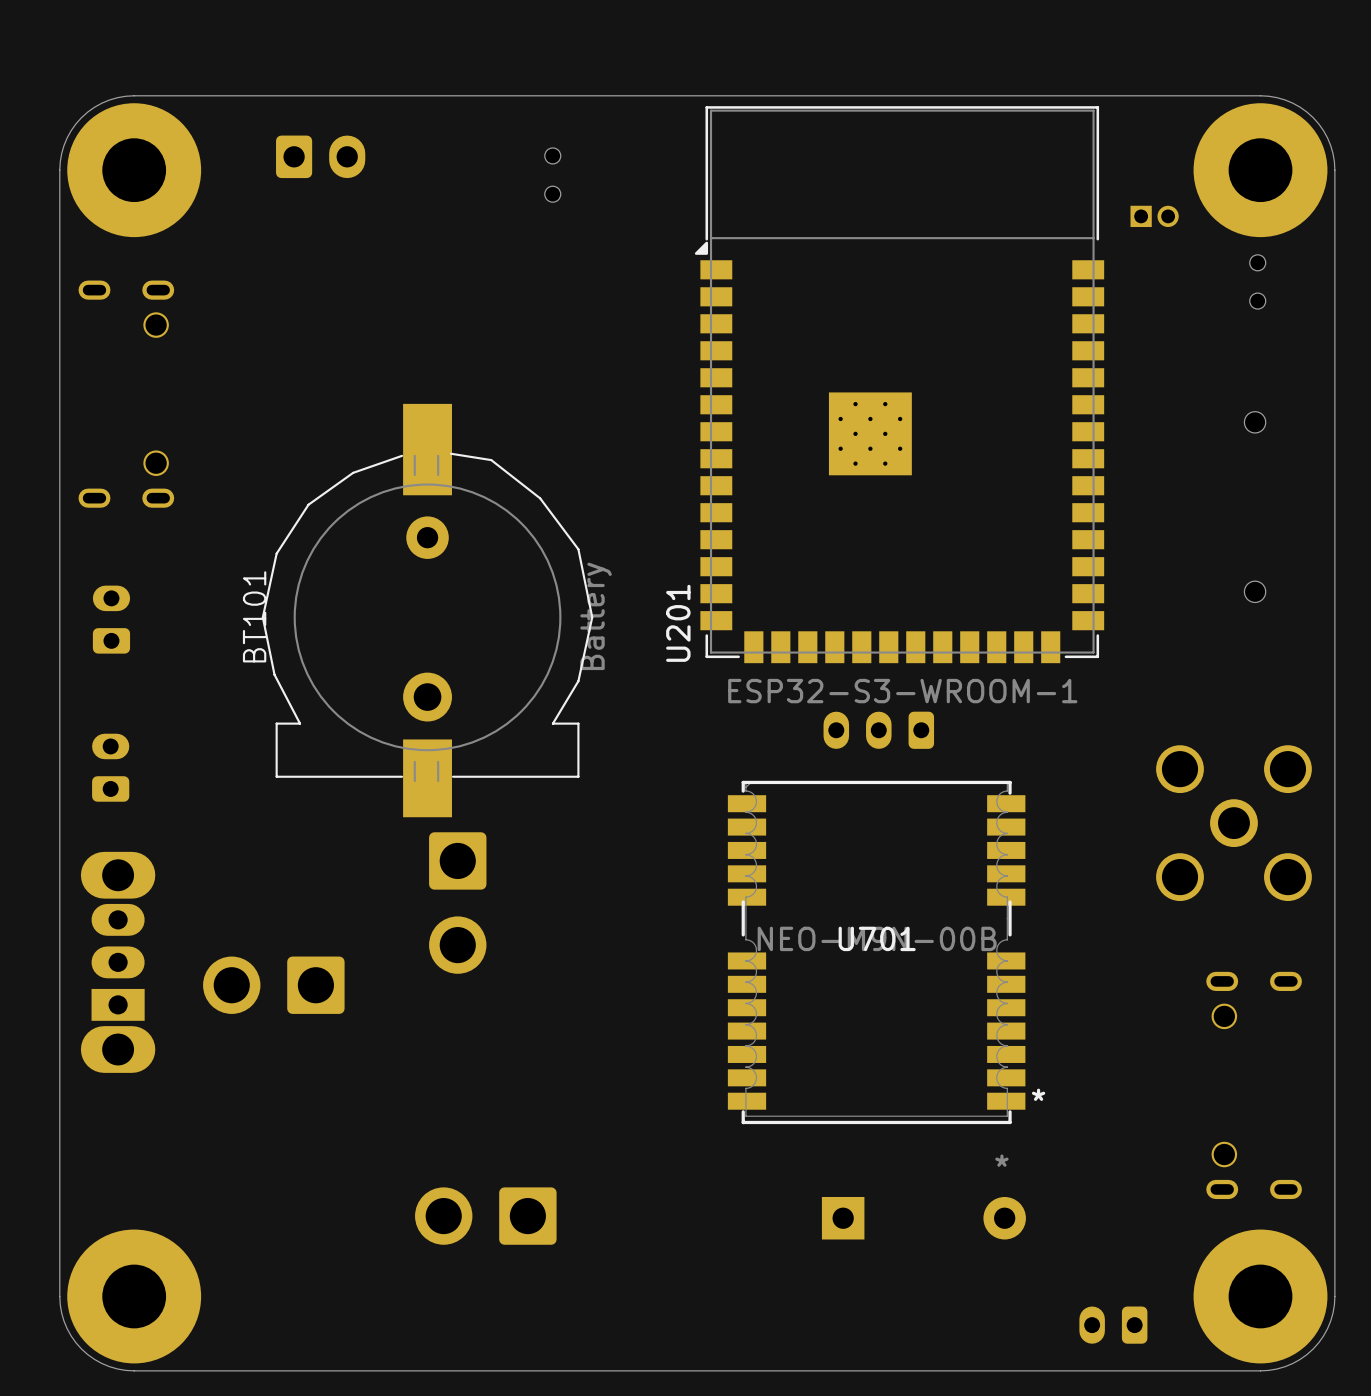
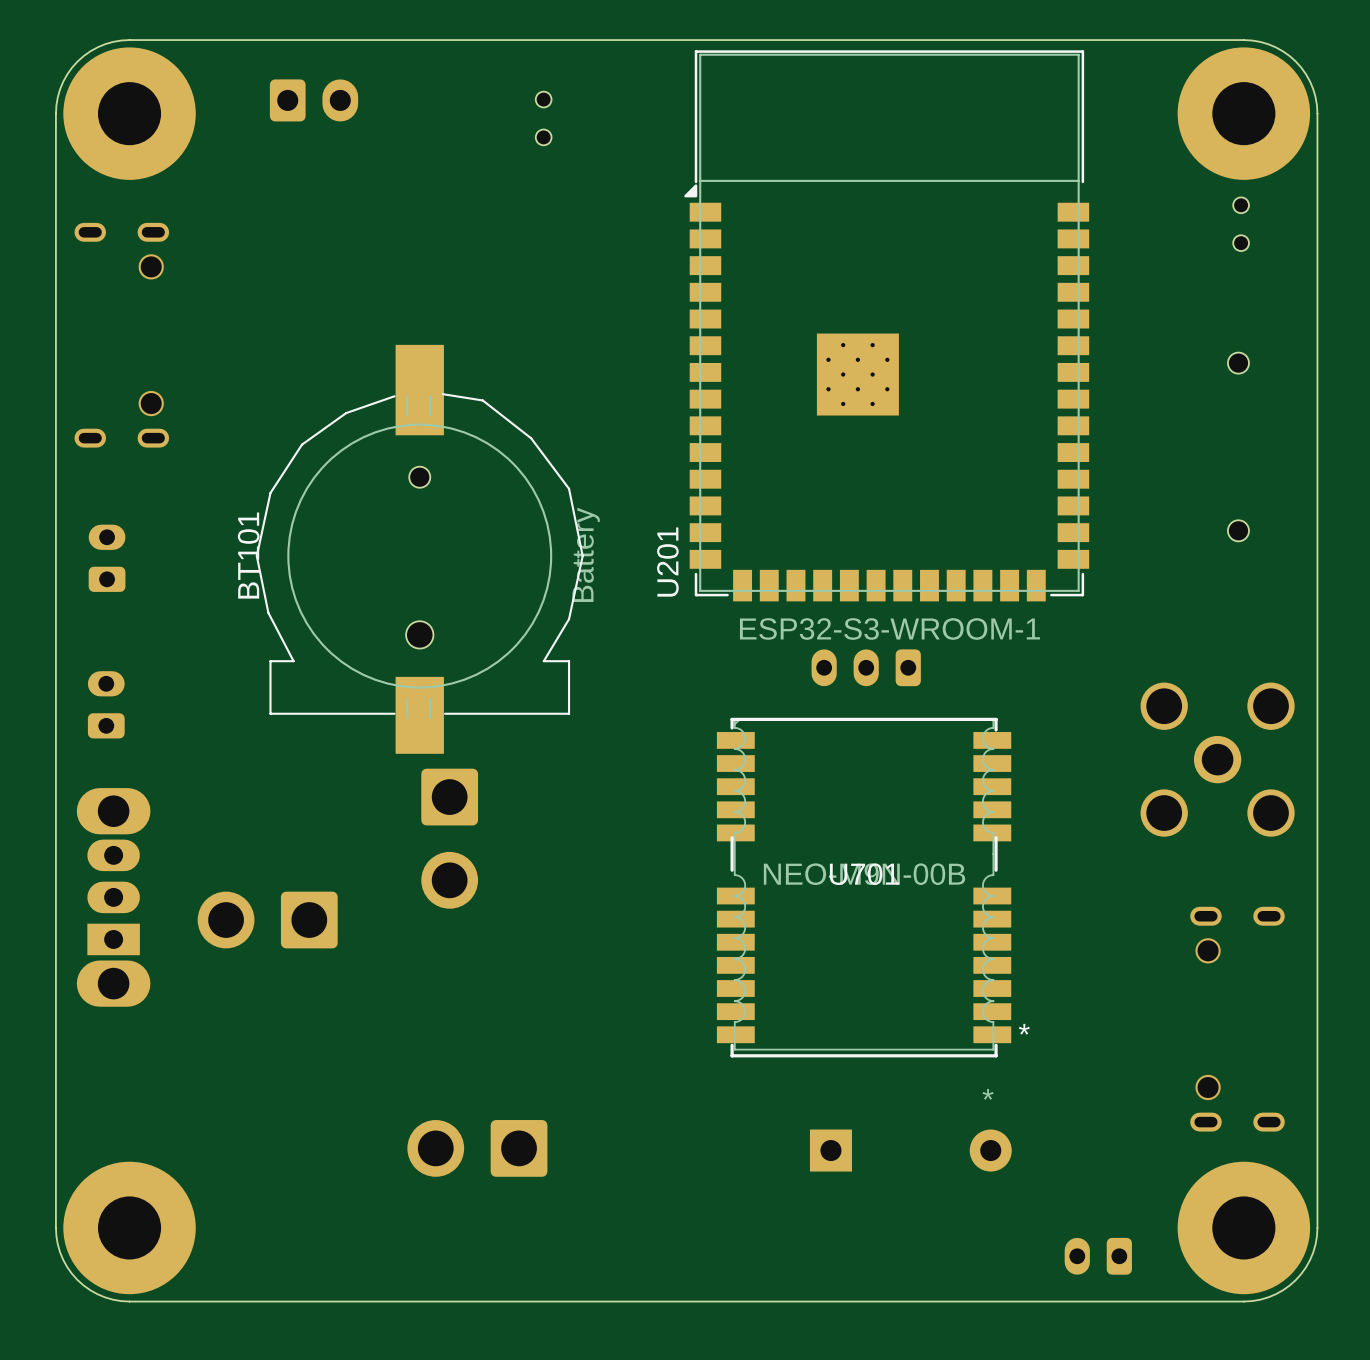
part: (1154, 216) -> none
BT101 footprint: [261, 403, 594, 818] -> [255, 344, 584, 754]

